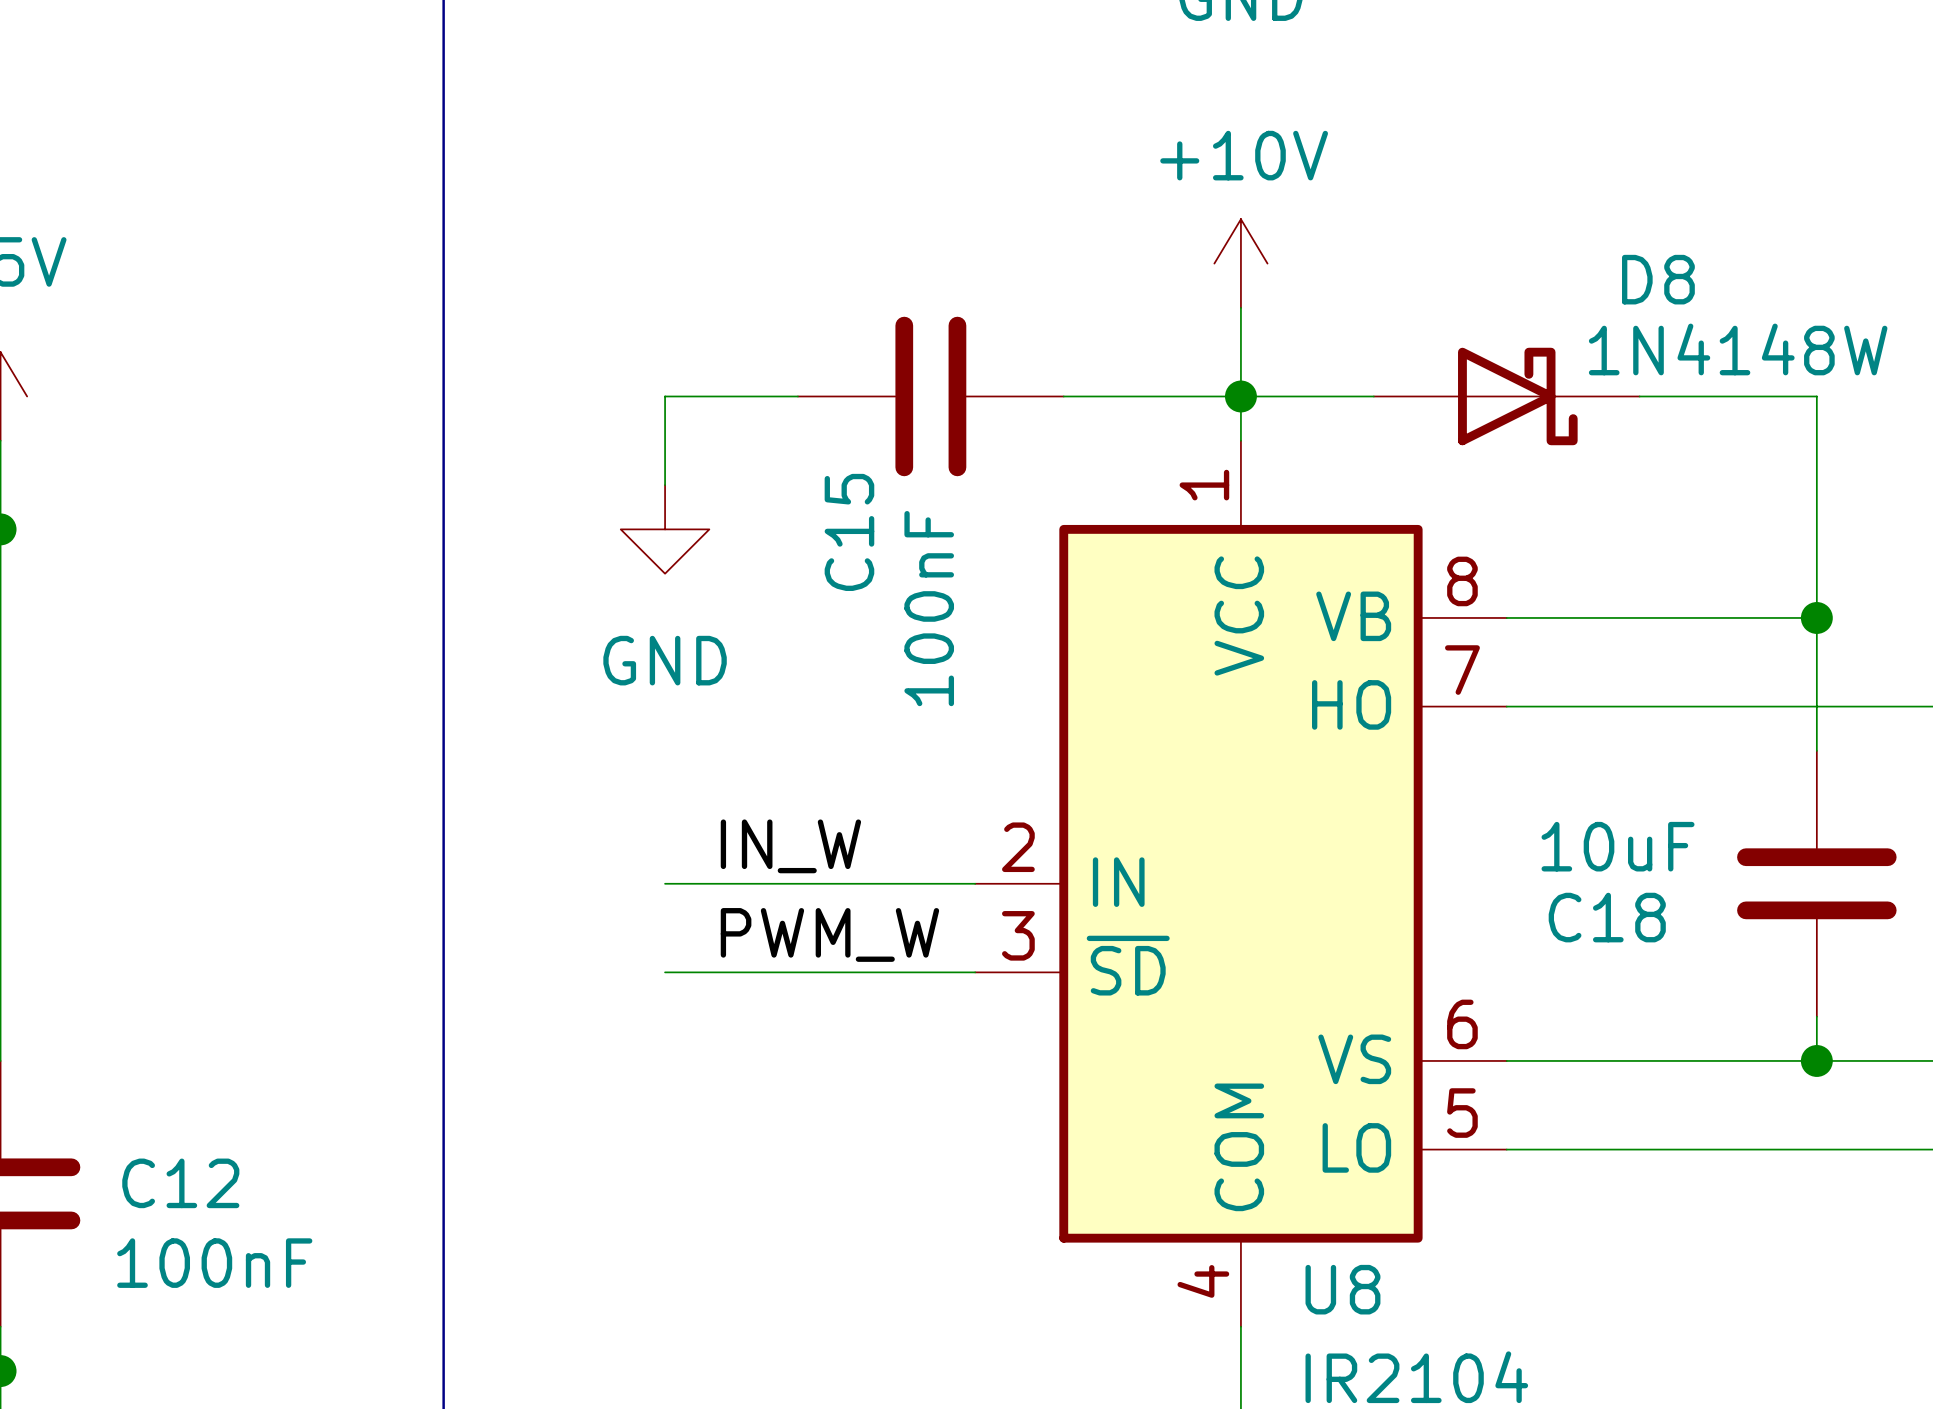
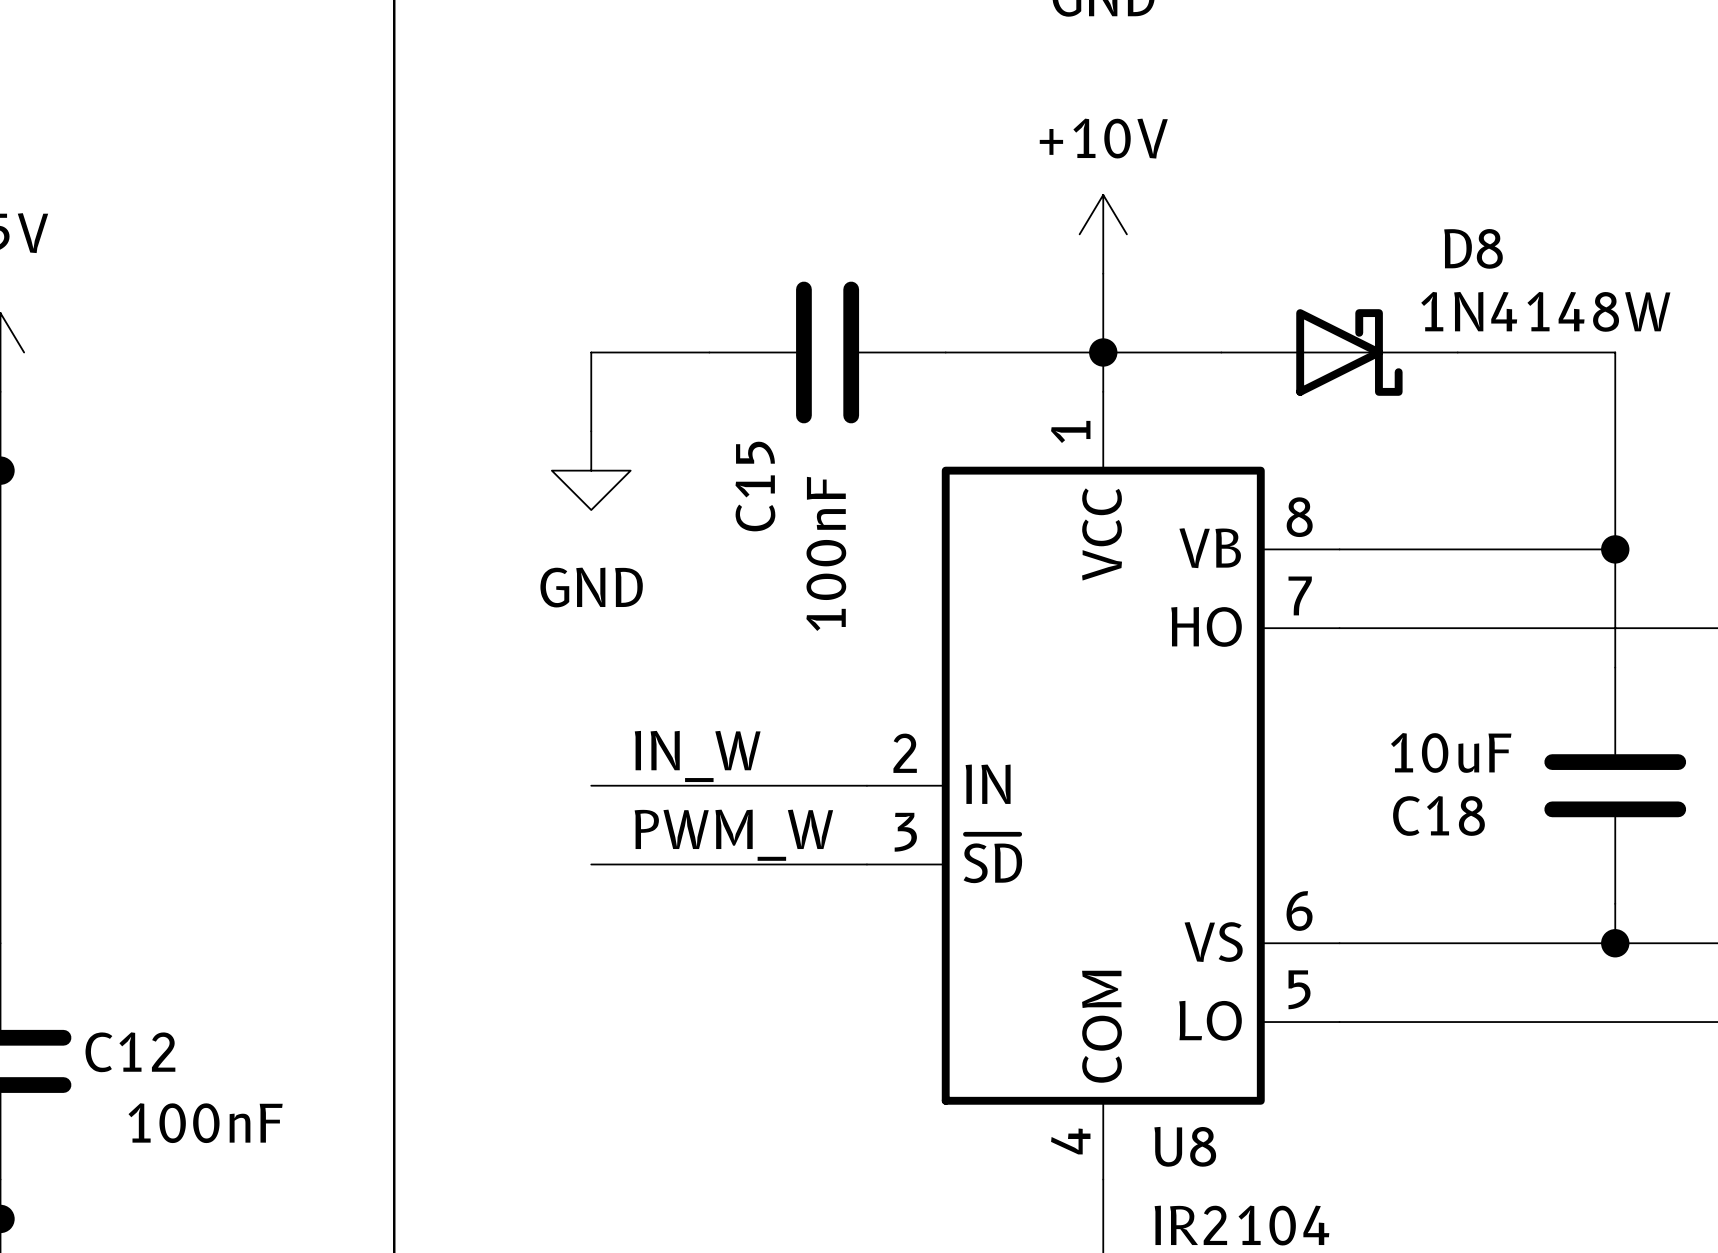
C12 name position: C12 (180, 1183) -> C12 (130, 1052)

